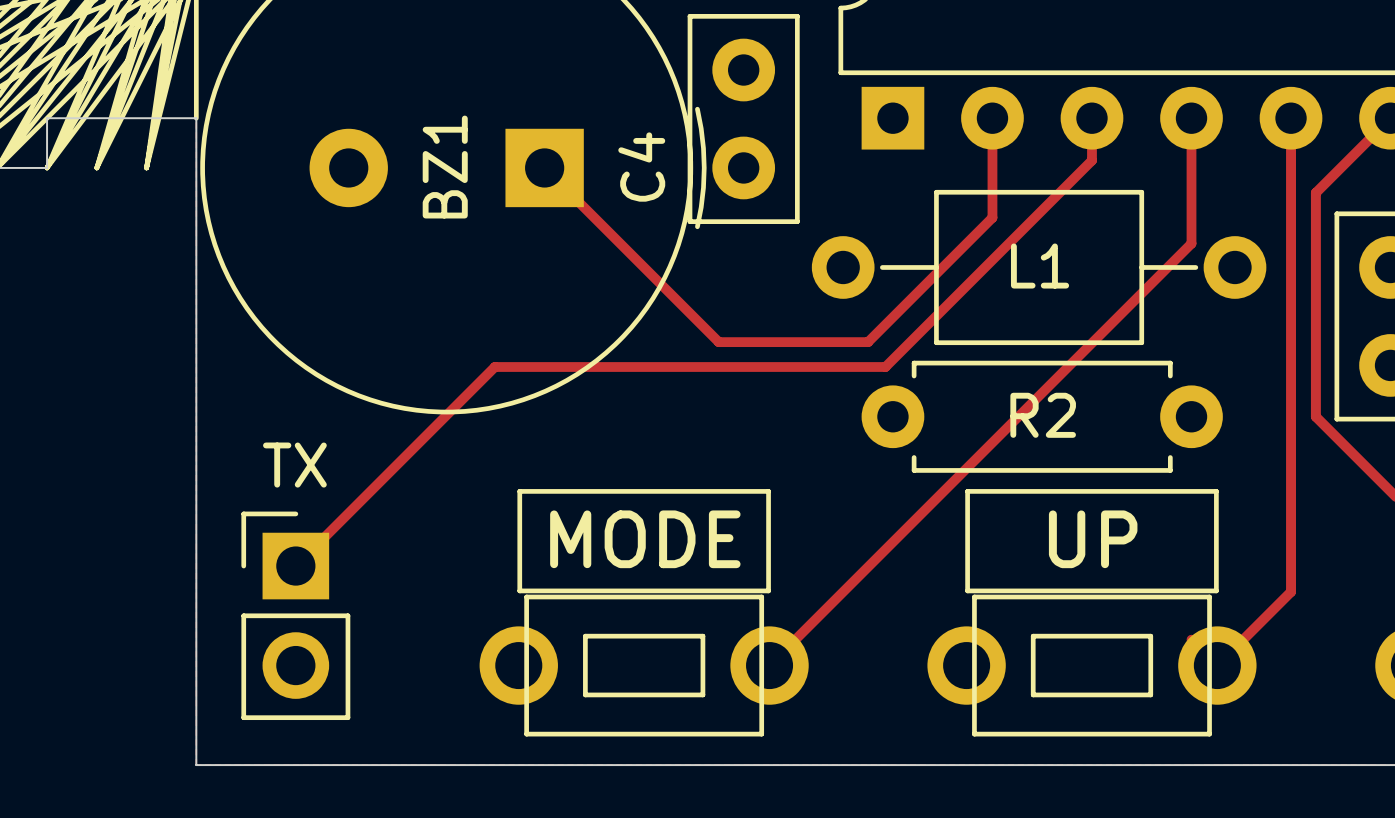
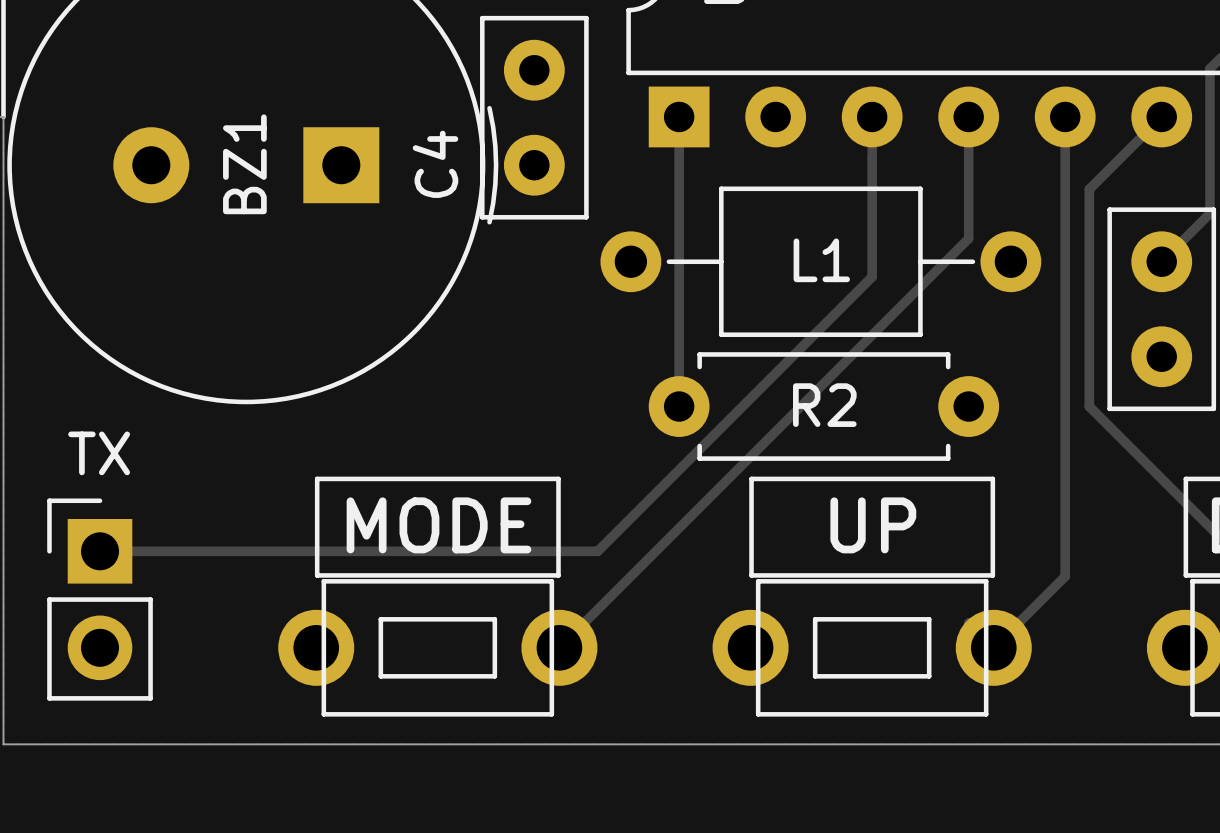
track: none -> (679, 116) (679, 406)
track: (992, 118) (992, 217) (868, 342) (718, 342) (544, 167) (541, 167) -> none
track: (1091, 160) (885, 367) (494, 367) (295, 566) -> (872, 157) (872, 276) (597, 551) (100, 551)

